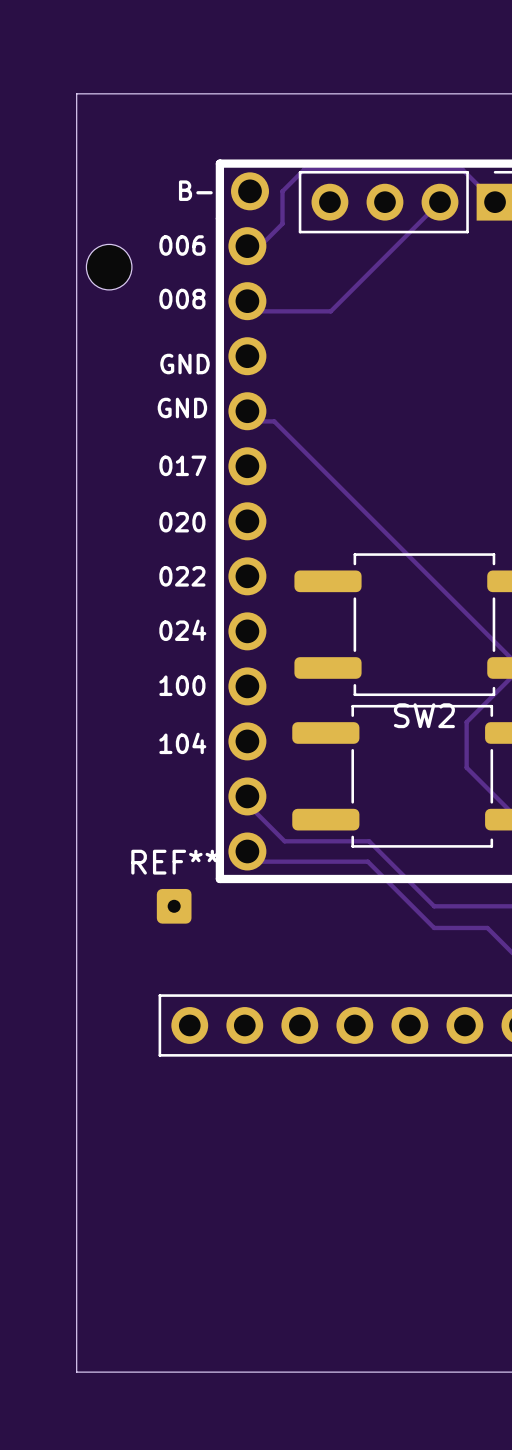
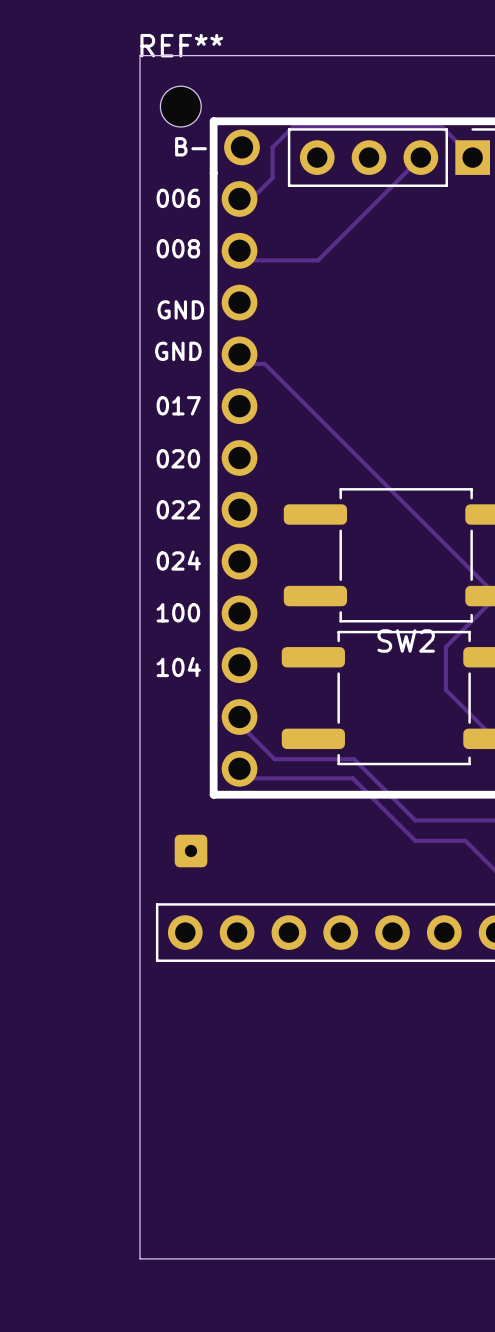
board edge: (141, 93) (76, 93) (76, 1372) (141, 1372) -> (140, 55) (140, 1258)
REF**: none -> (180, 106)
part: (109, 267) -> none
REF**: (174, 906) -> none
part: none -> (191, 851)

